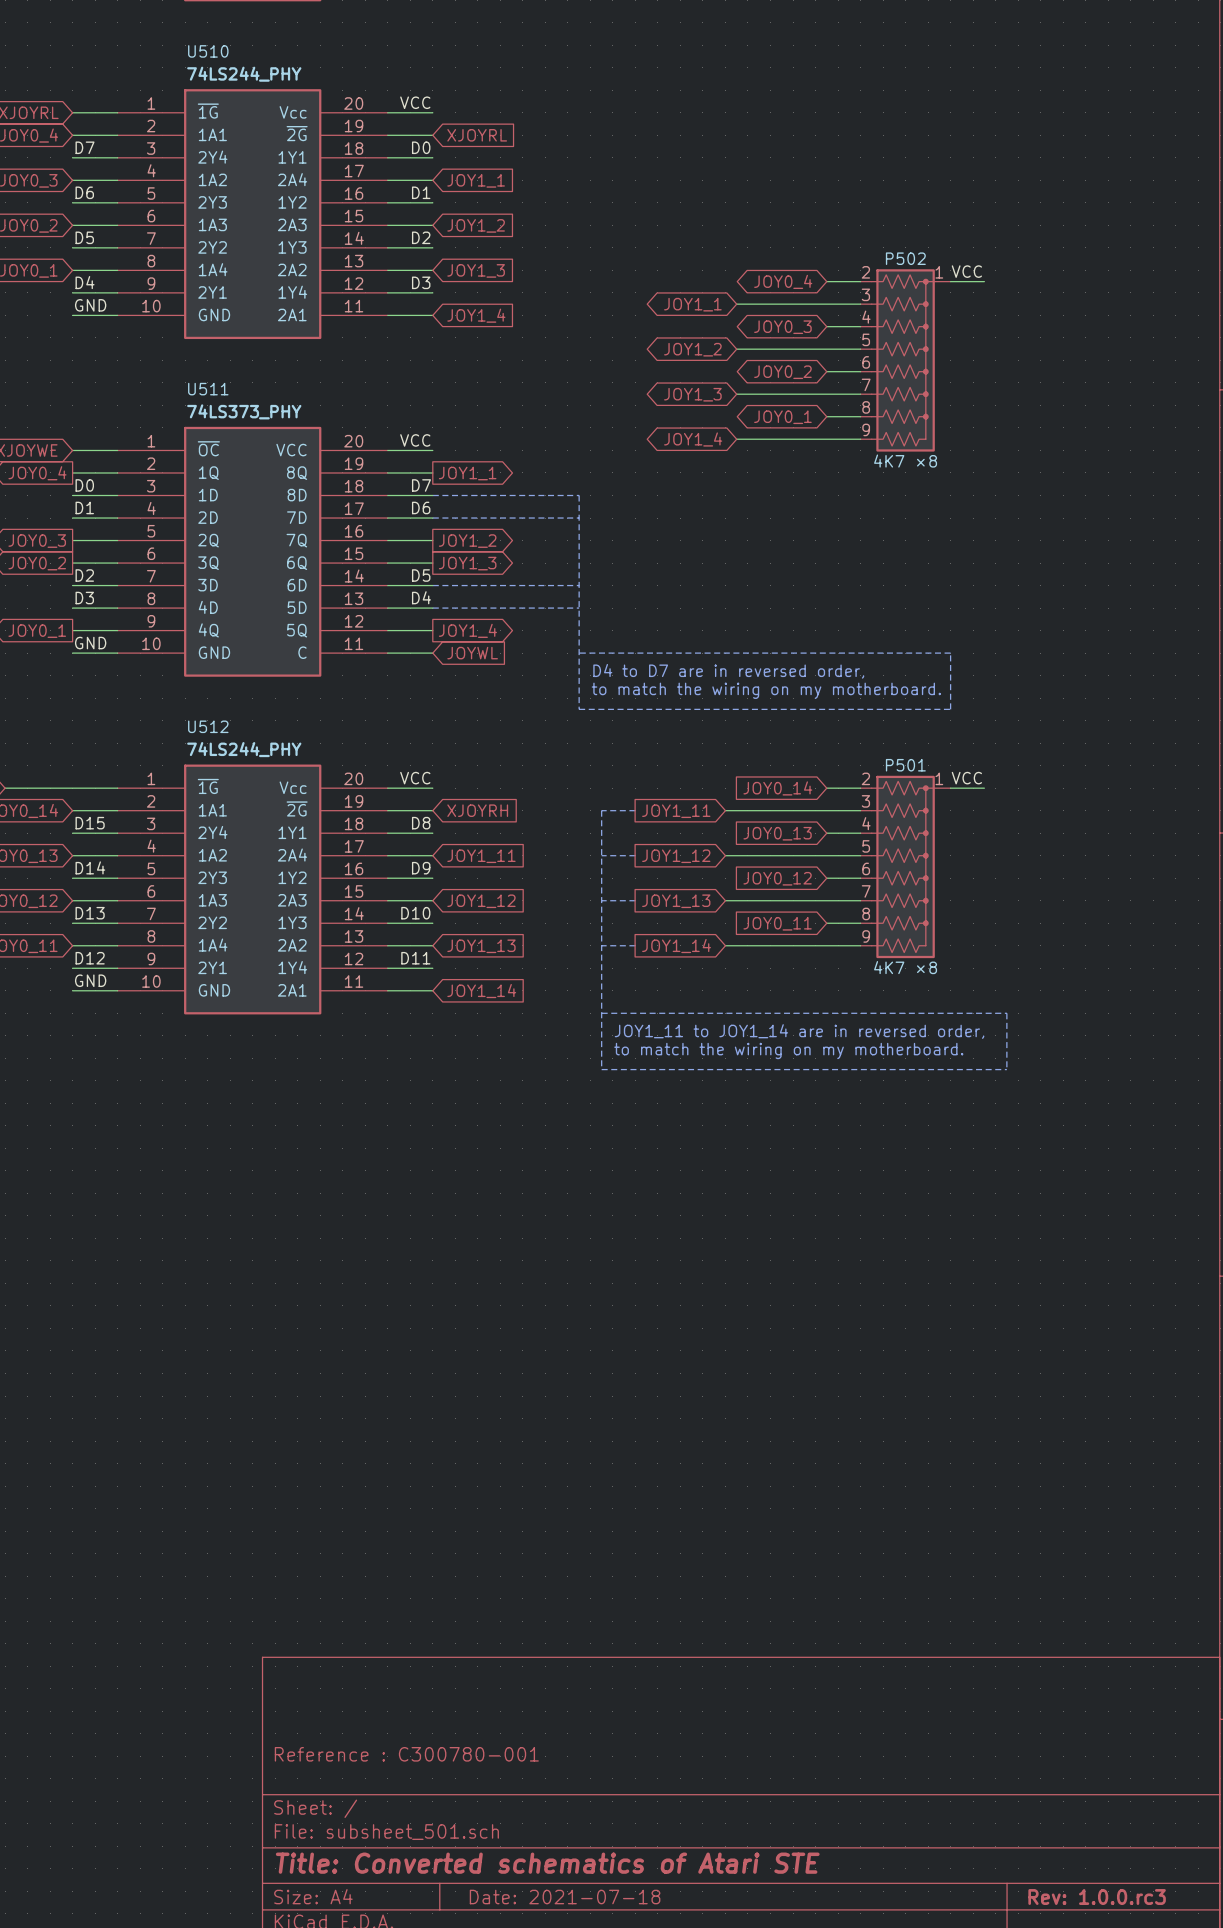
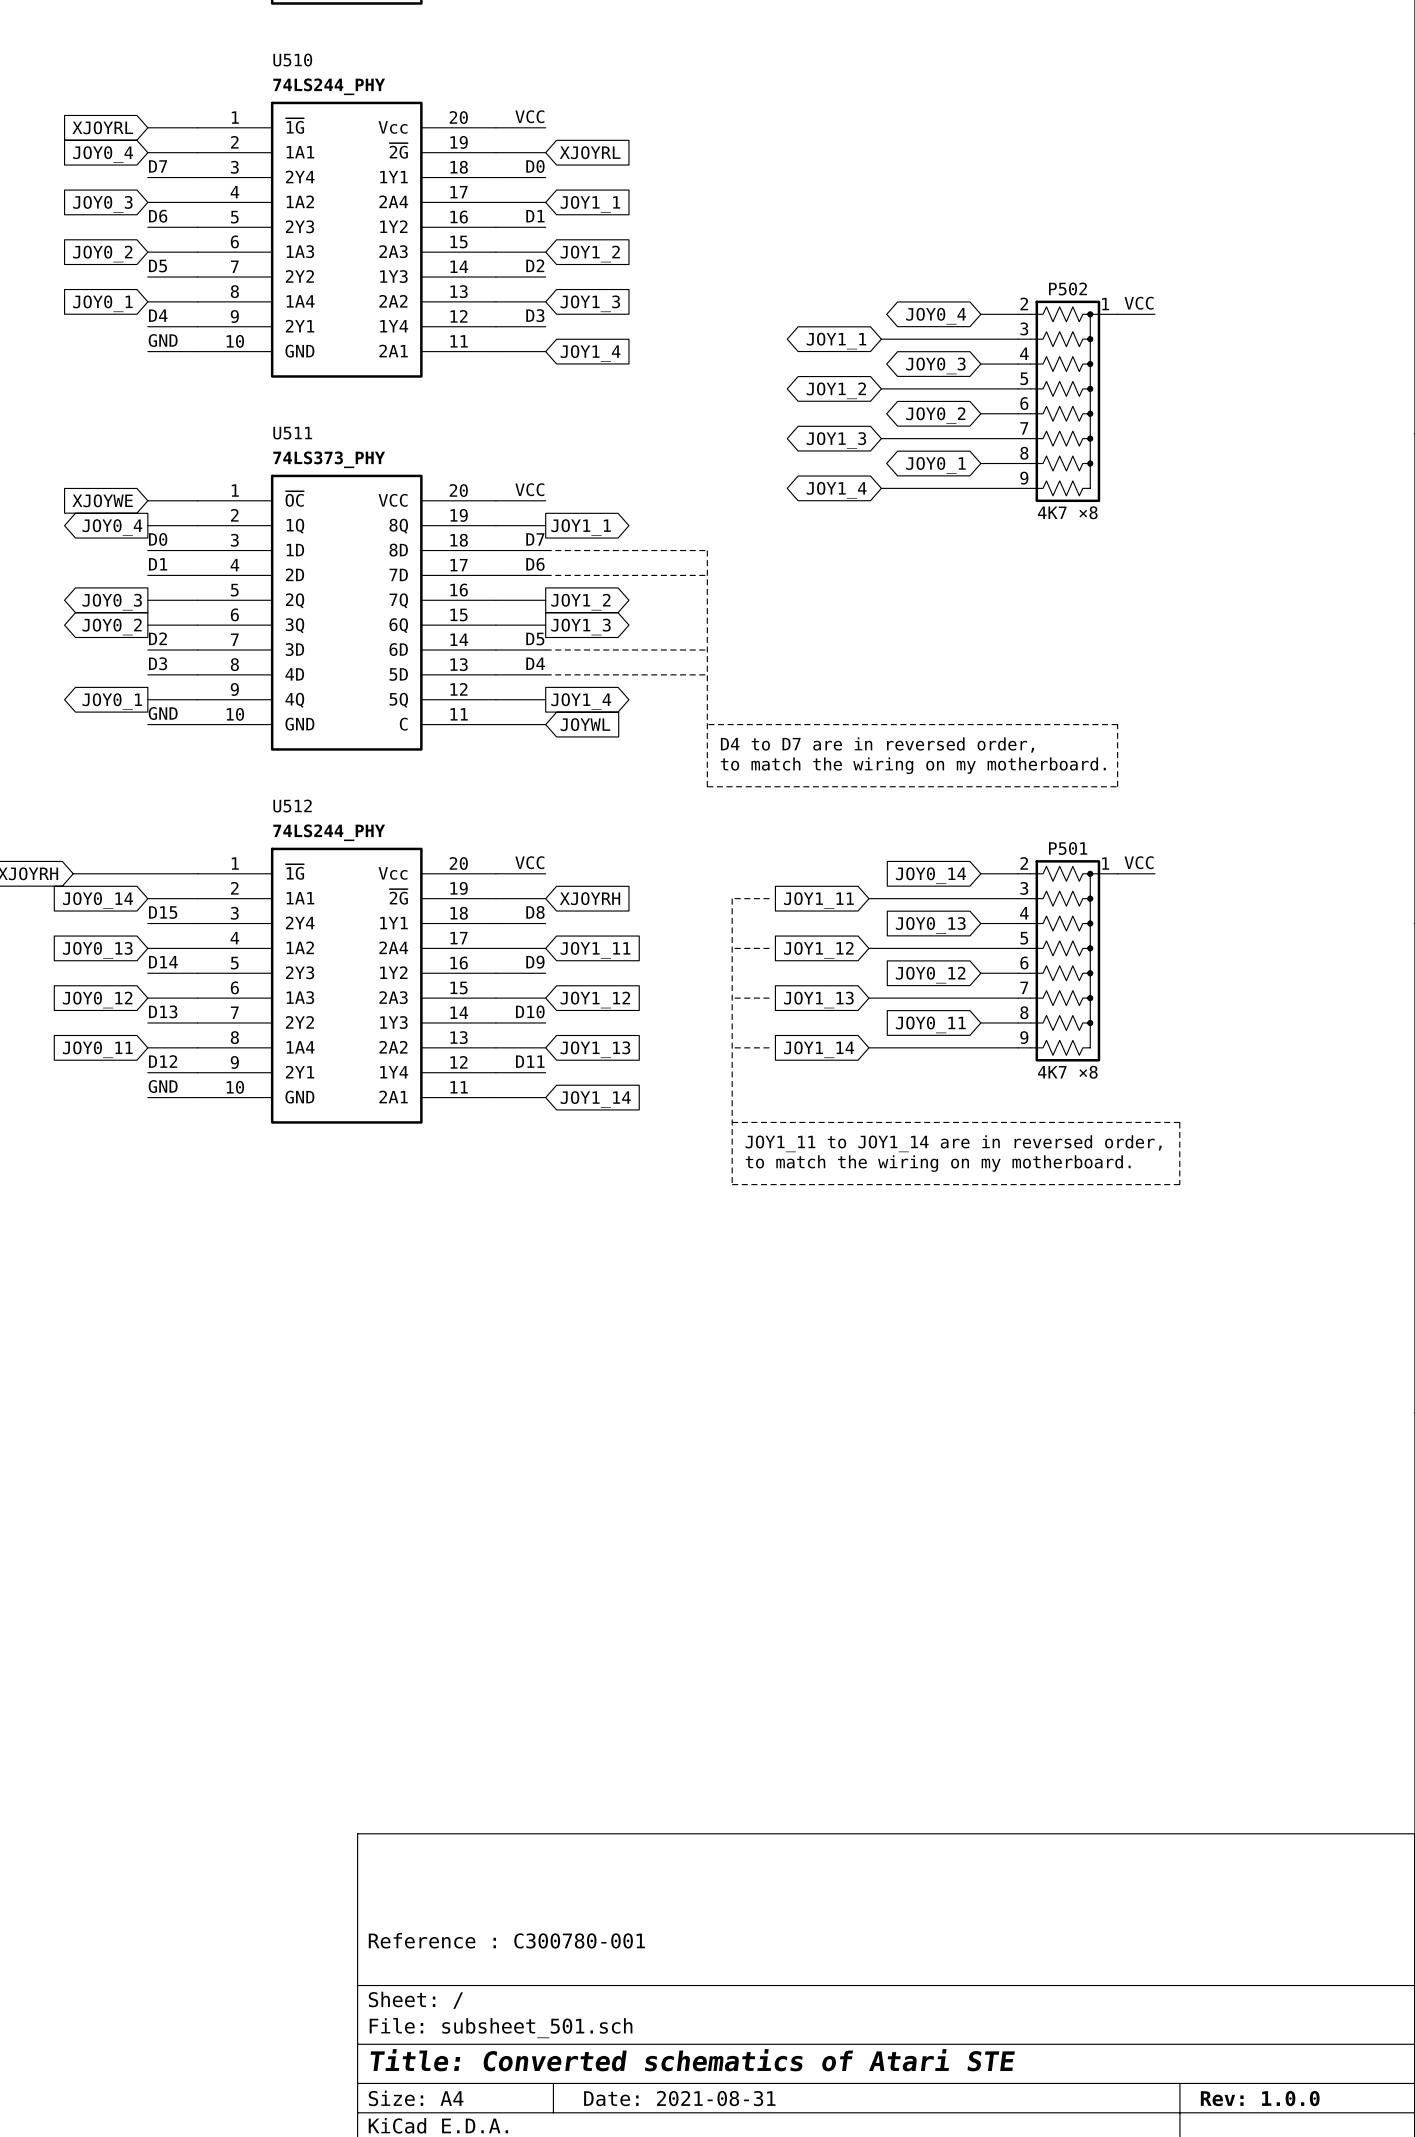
title block: Date: 2021-07-18 (565, 1897) -> Date: 2021-08-31 (679, 2098)
title block: Rev: 1.0.0.rc3 (1097, 1897) -> Rev: 1.0.0 (1260, 2098)

